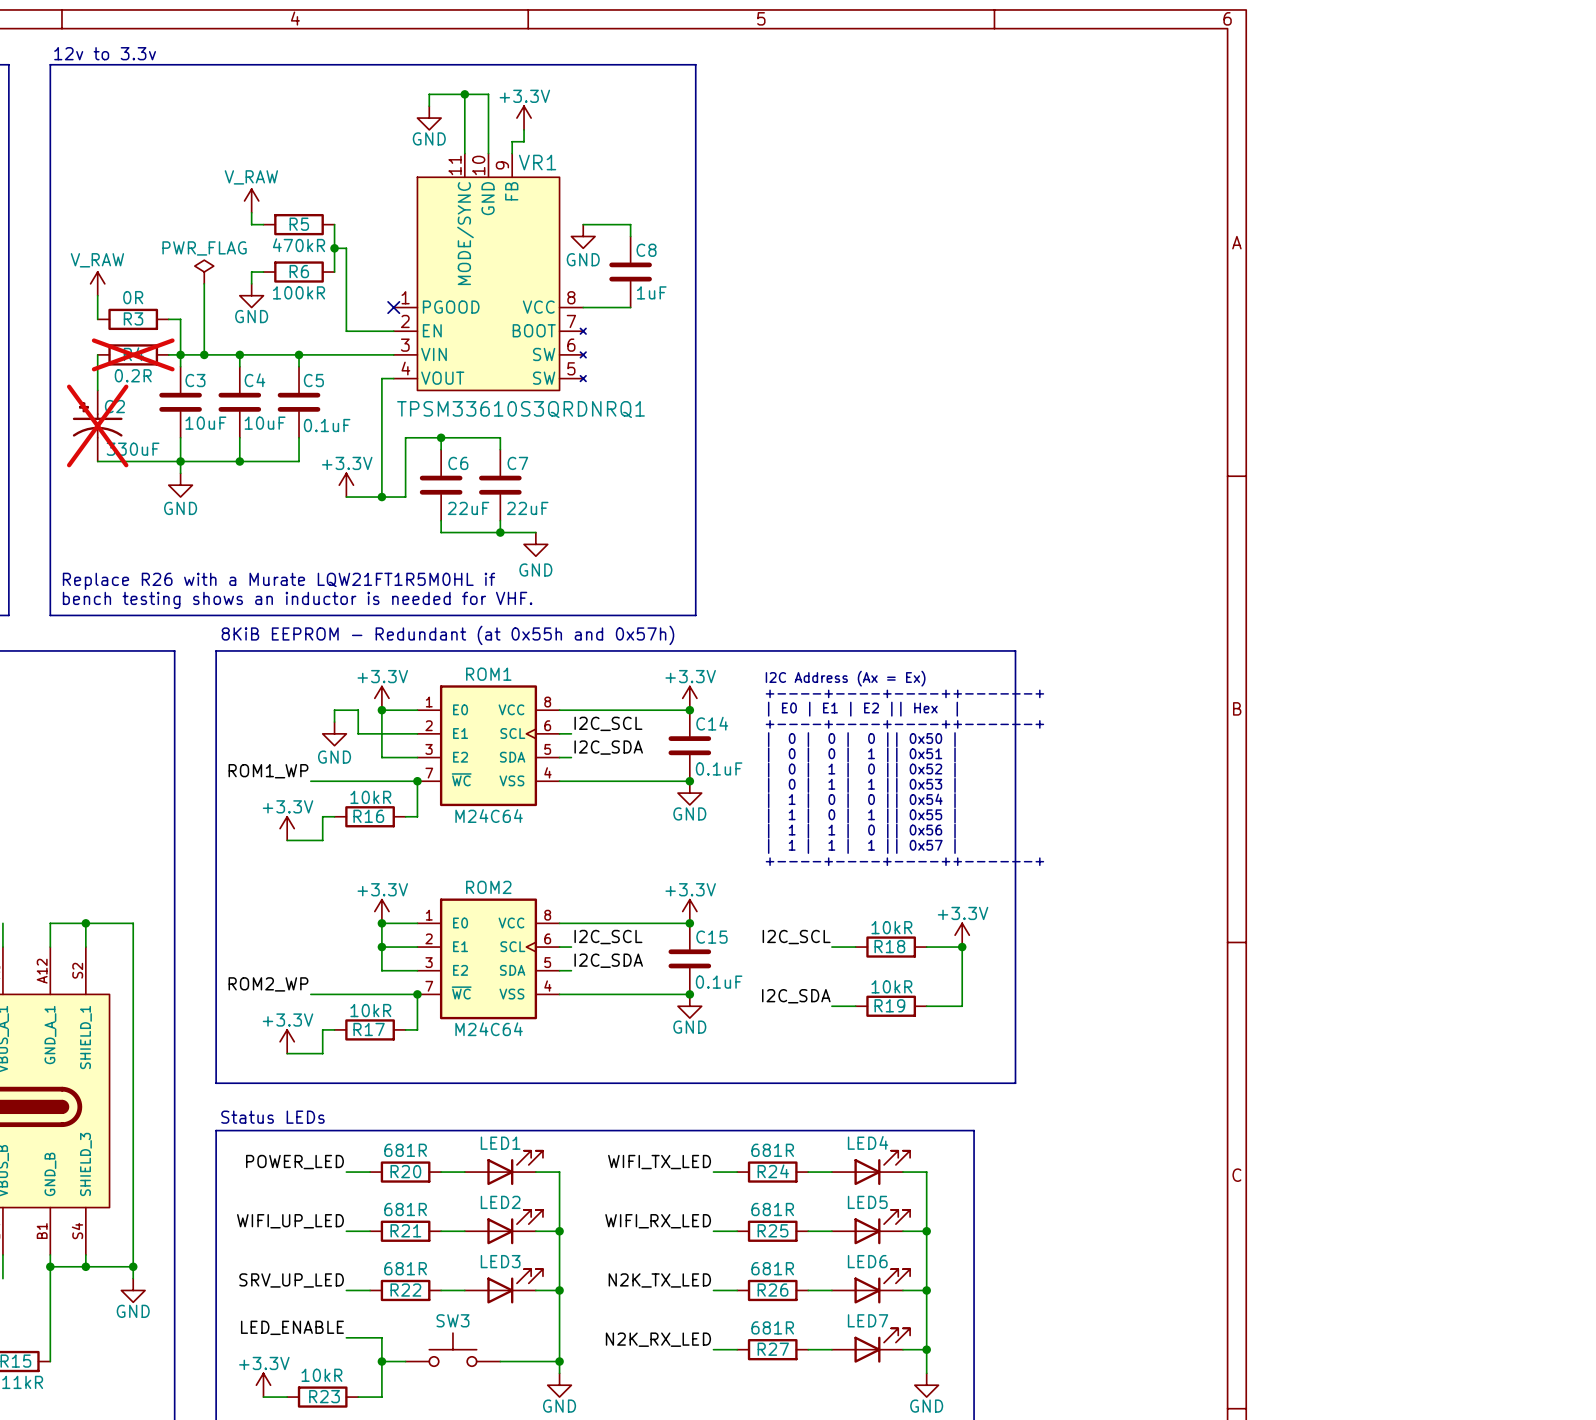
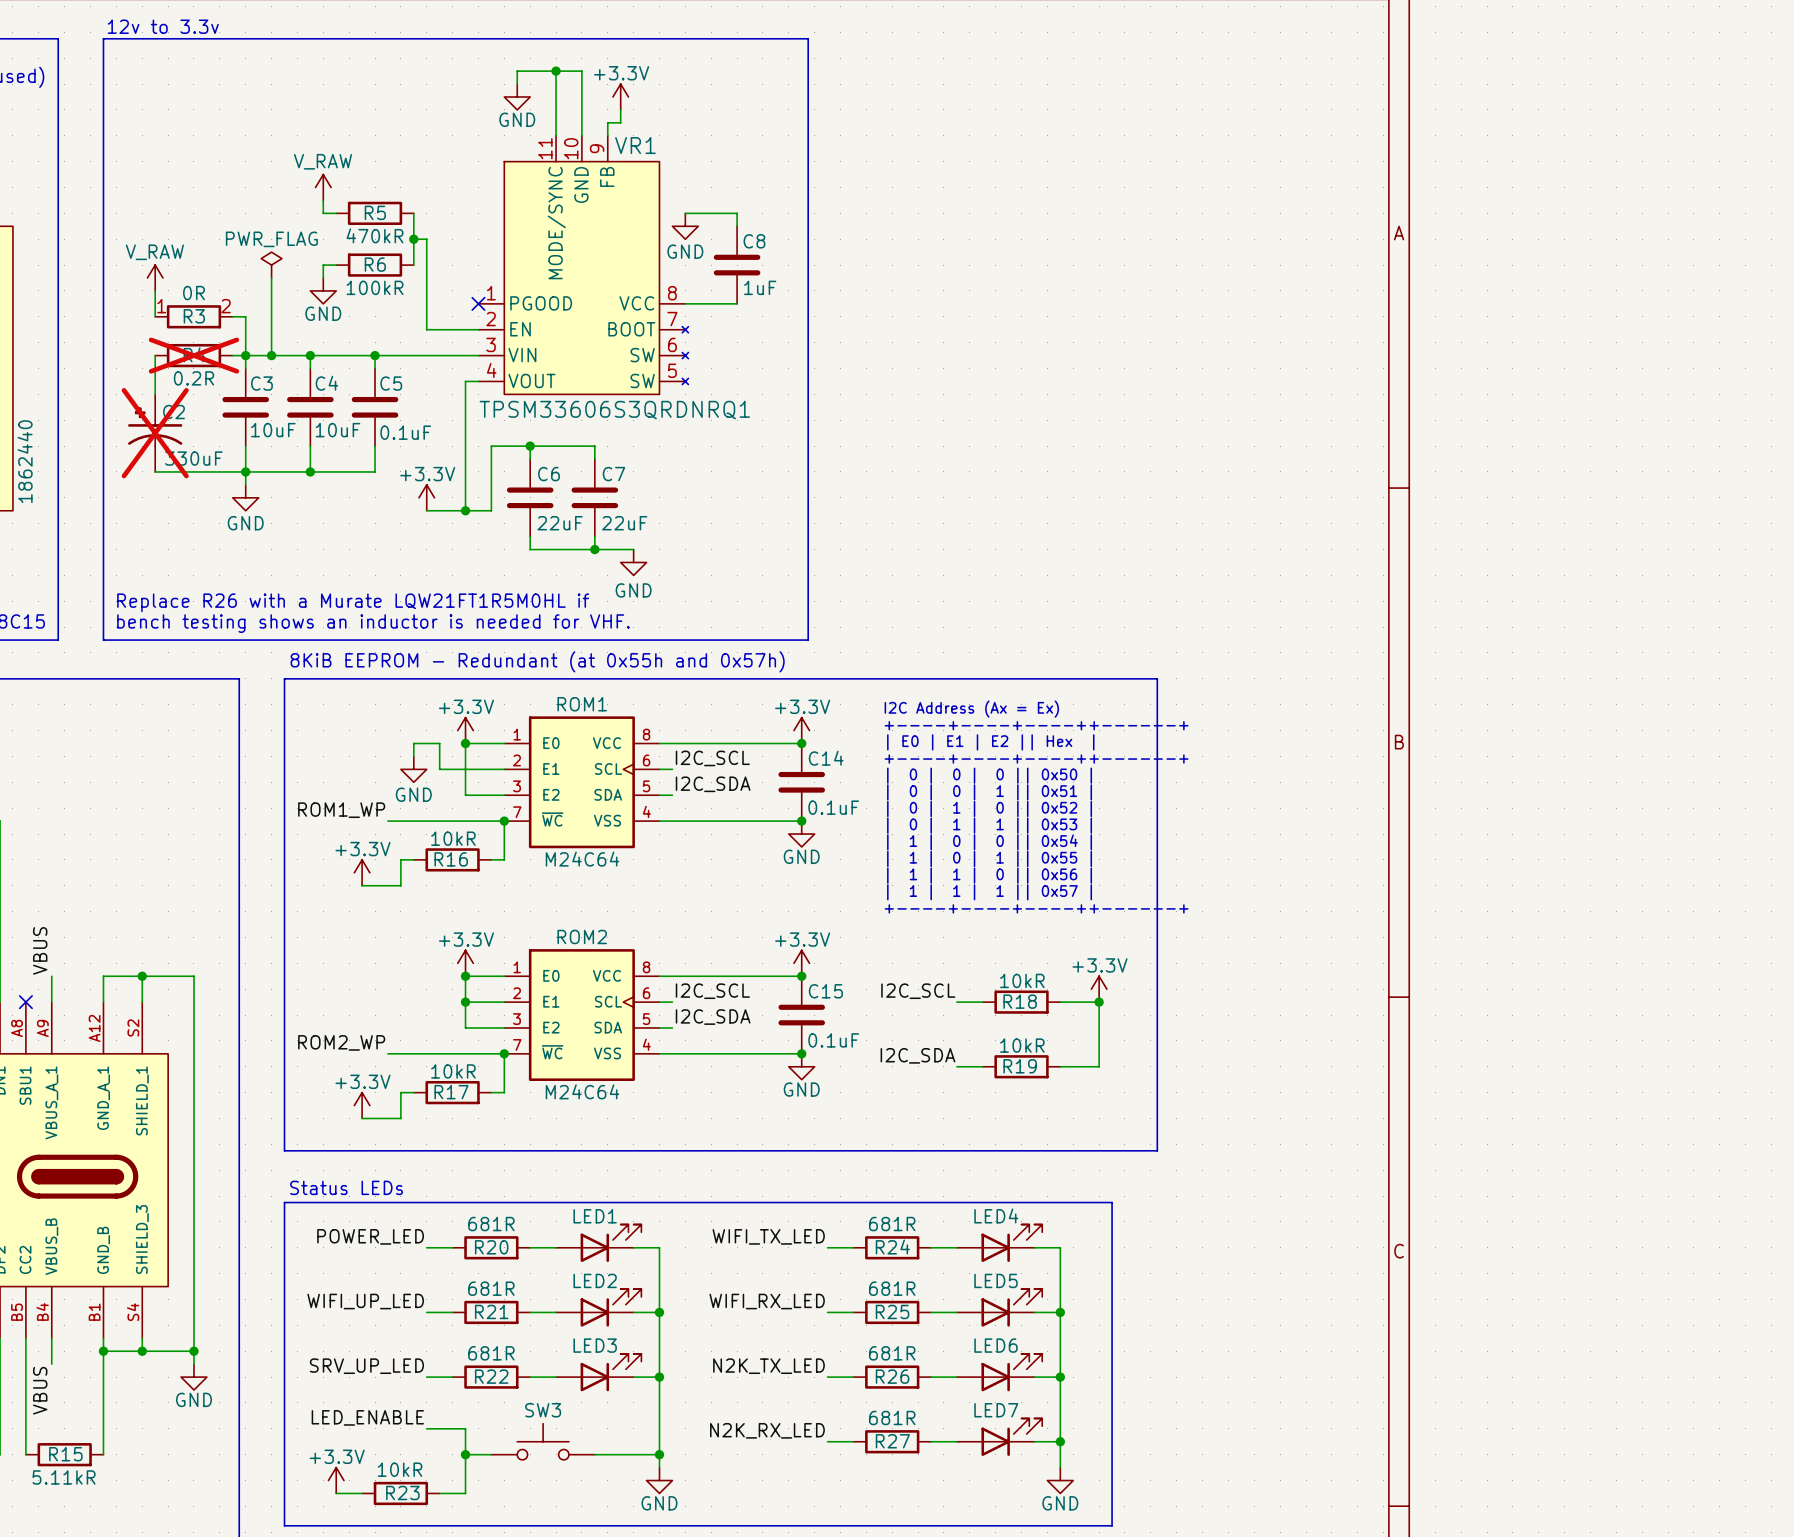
R3 pin number: none -> 1 (161, 306)
R3 pin number: none -> 2 (226, 306)
VR1 value: TPSM33610S3QRDNRQ1 (520, 409) -> TPSM33606S3QRDNRQ1 (614, 410)

